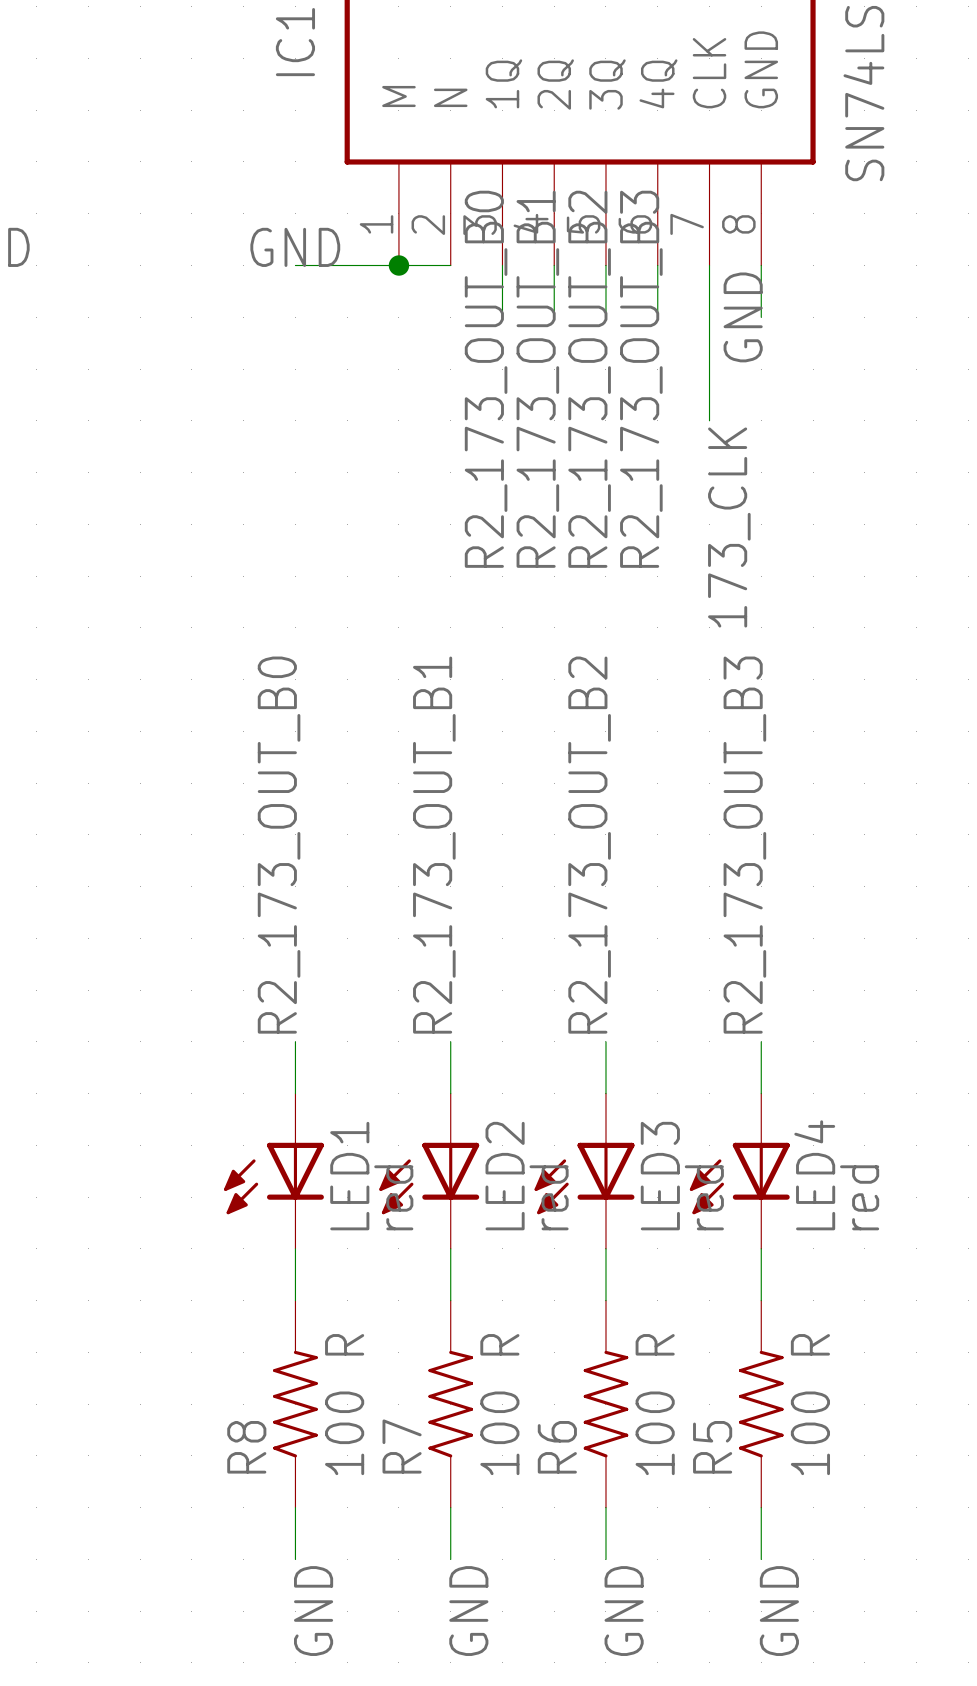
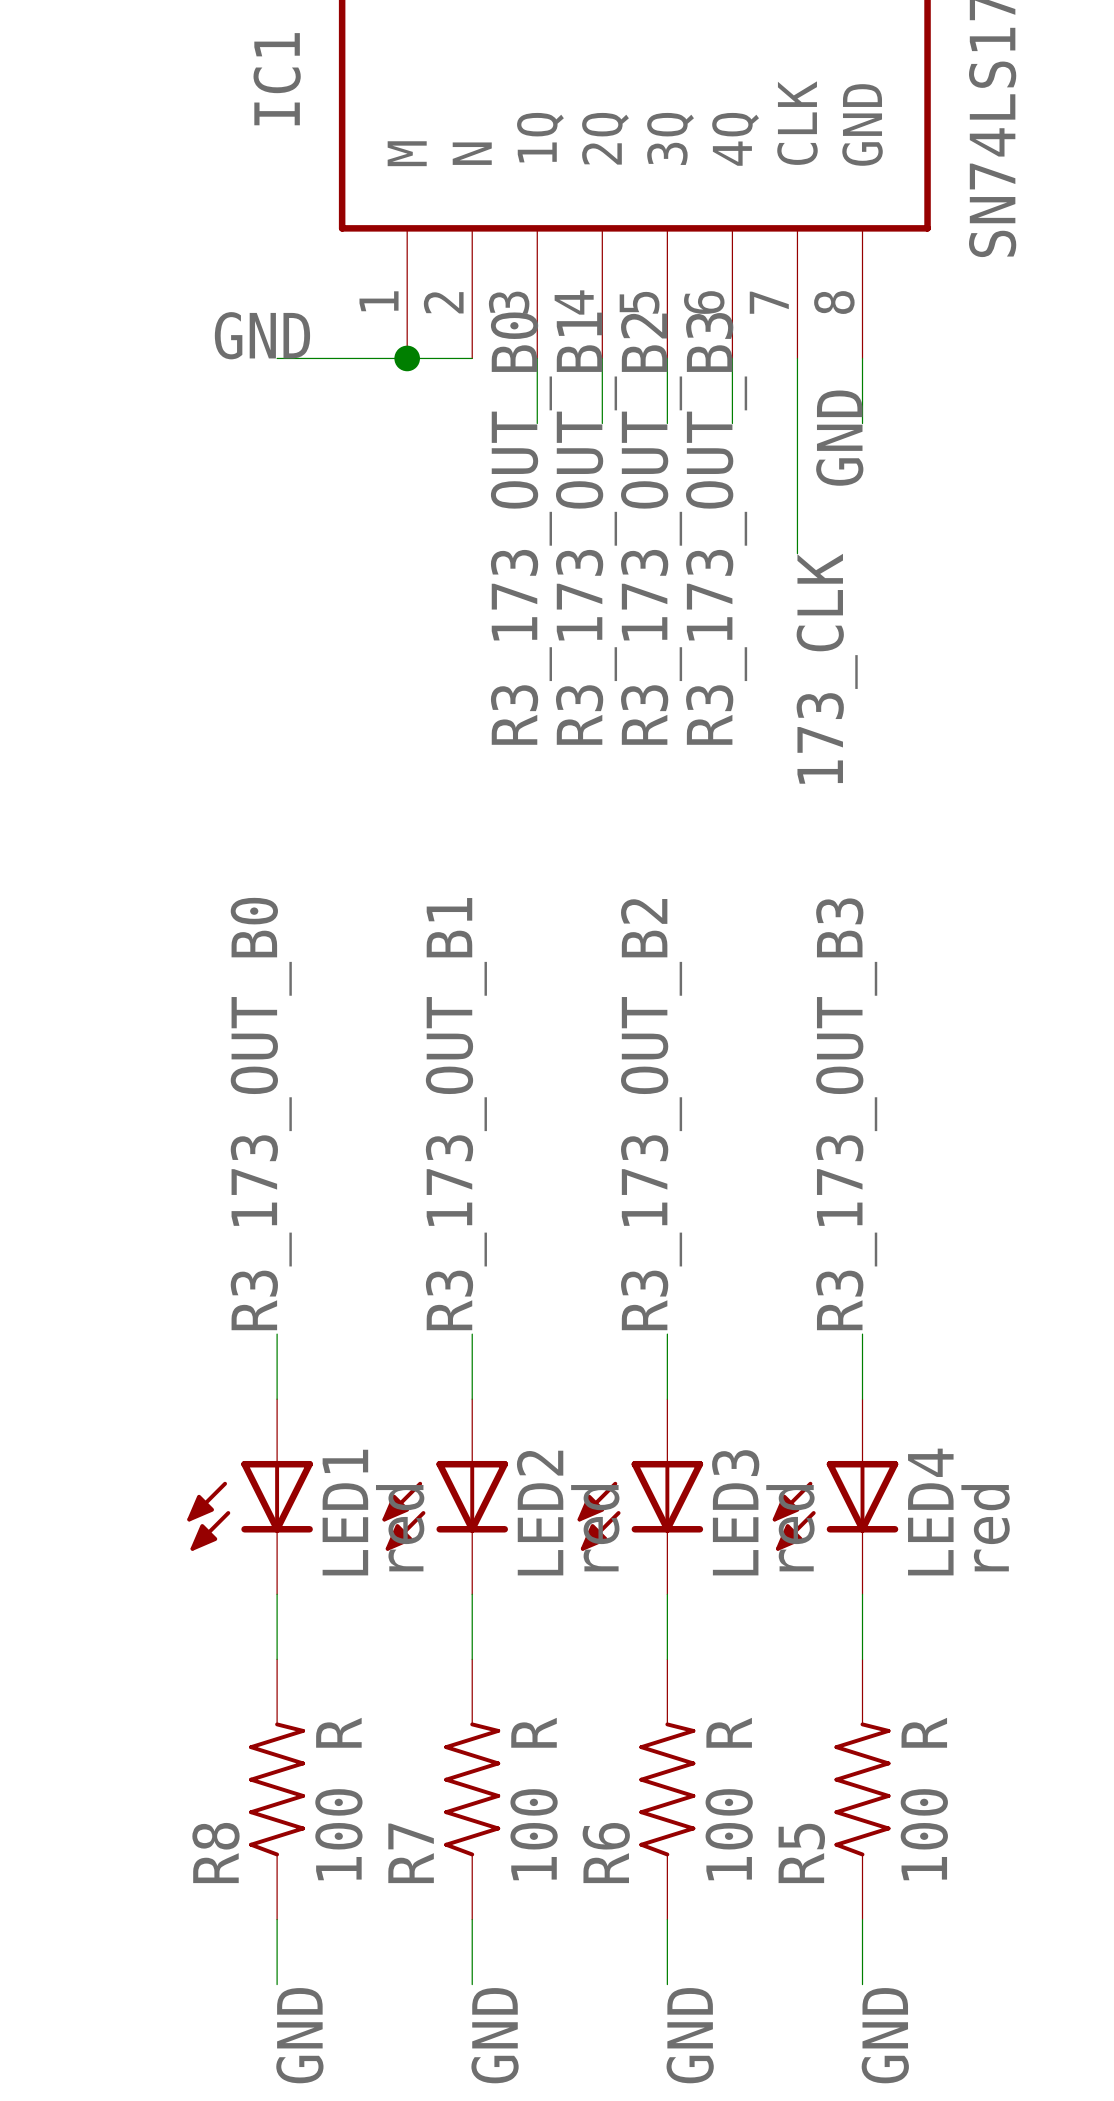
label: R2_173_OUT_B0 (486, 379) -> R3_173_OUT_B0 (521, 528)
label: R2_173_OUT_B1 (537, 379) -> R3_173_OUT_B1 (586, 528)
label: R2_173_OUT_B2 (589, 379) -> R3_173_OUT_B2 (651, 529)
label: R2_173_OUT_B3 (641, 379) -> R3_173_OUT_B3 (716, 528)
label: R2_173_OUT_B0 (279, 845) -> R3_173_OUT_B0 (261, 1114)
label: R2_173_OUT_B1 (434, 845) -> R3_173_OUT_B1 (456, 1114)
label: R2_173_OUT_B2 (589, 845) -> R3_173_OUT_B2 (651, 1114)
label: R2_173_OUT_B3 (744, 845) -> R3_173_OUT_B3 (846, 1114)

